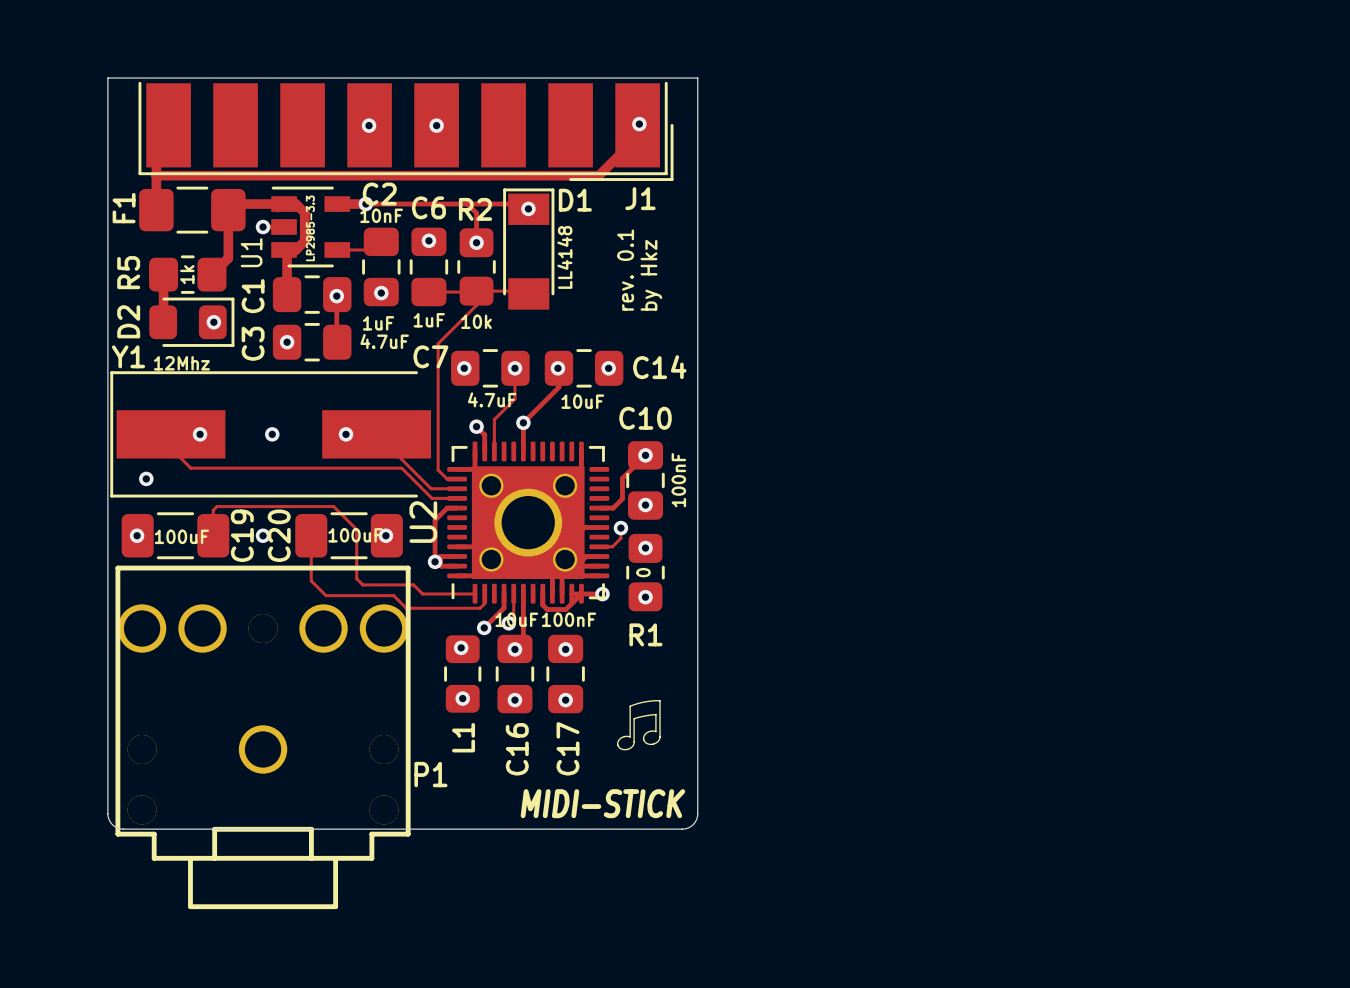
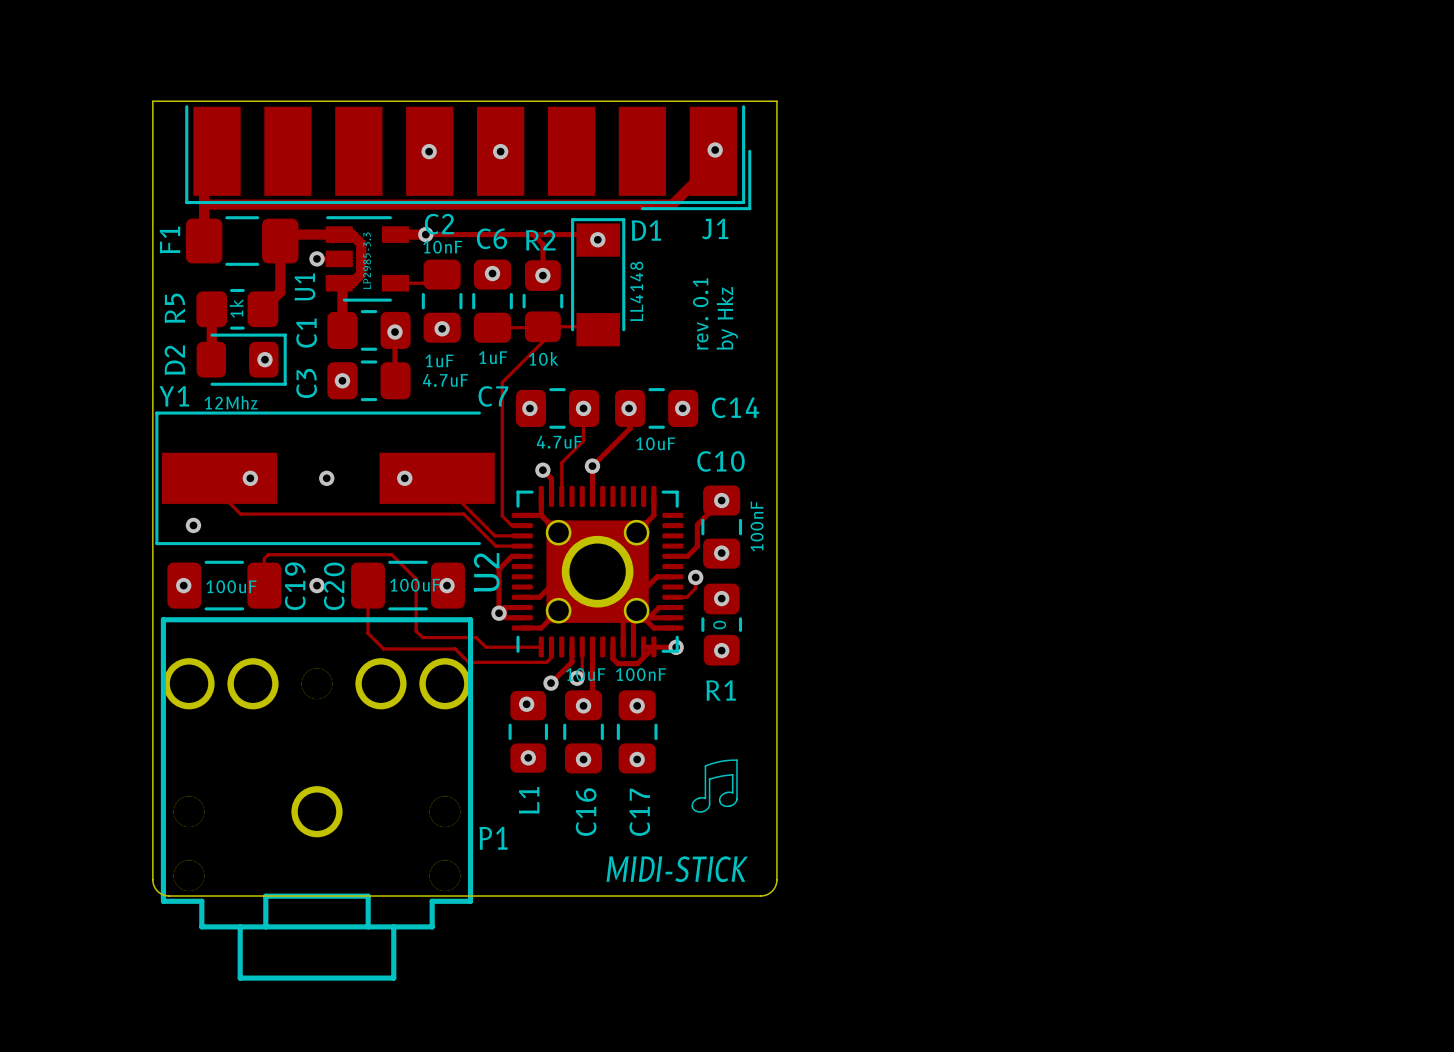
U2 footprint: [447, 441, 610, 604] -> [511, 485, 684, 658]

